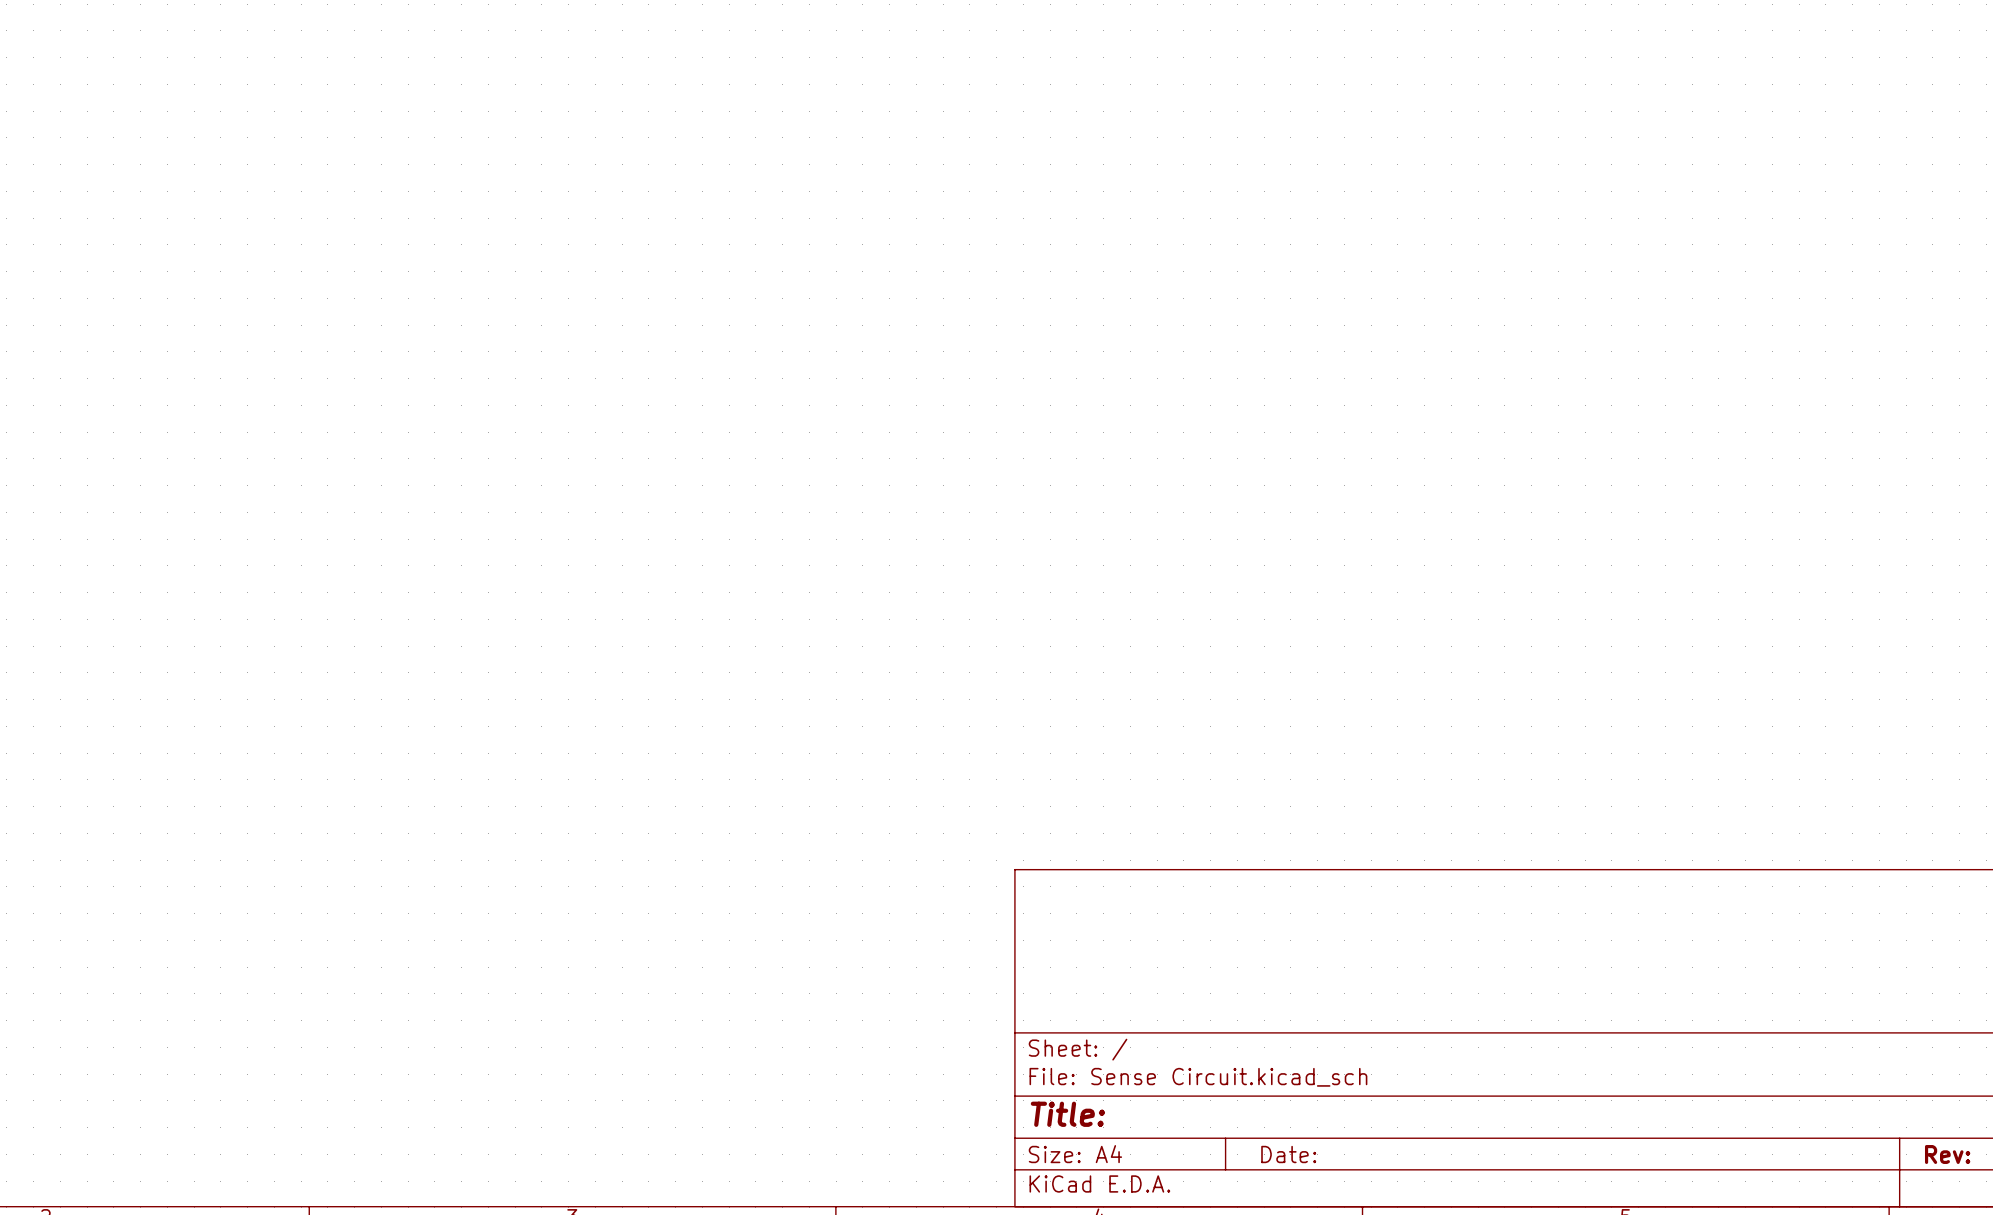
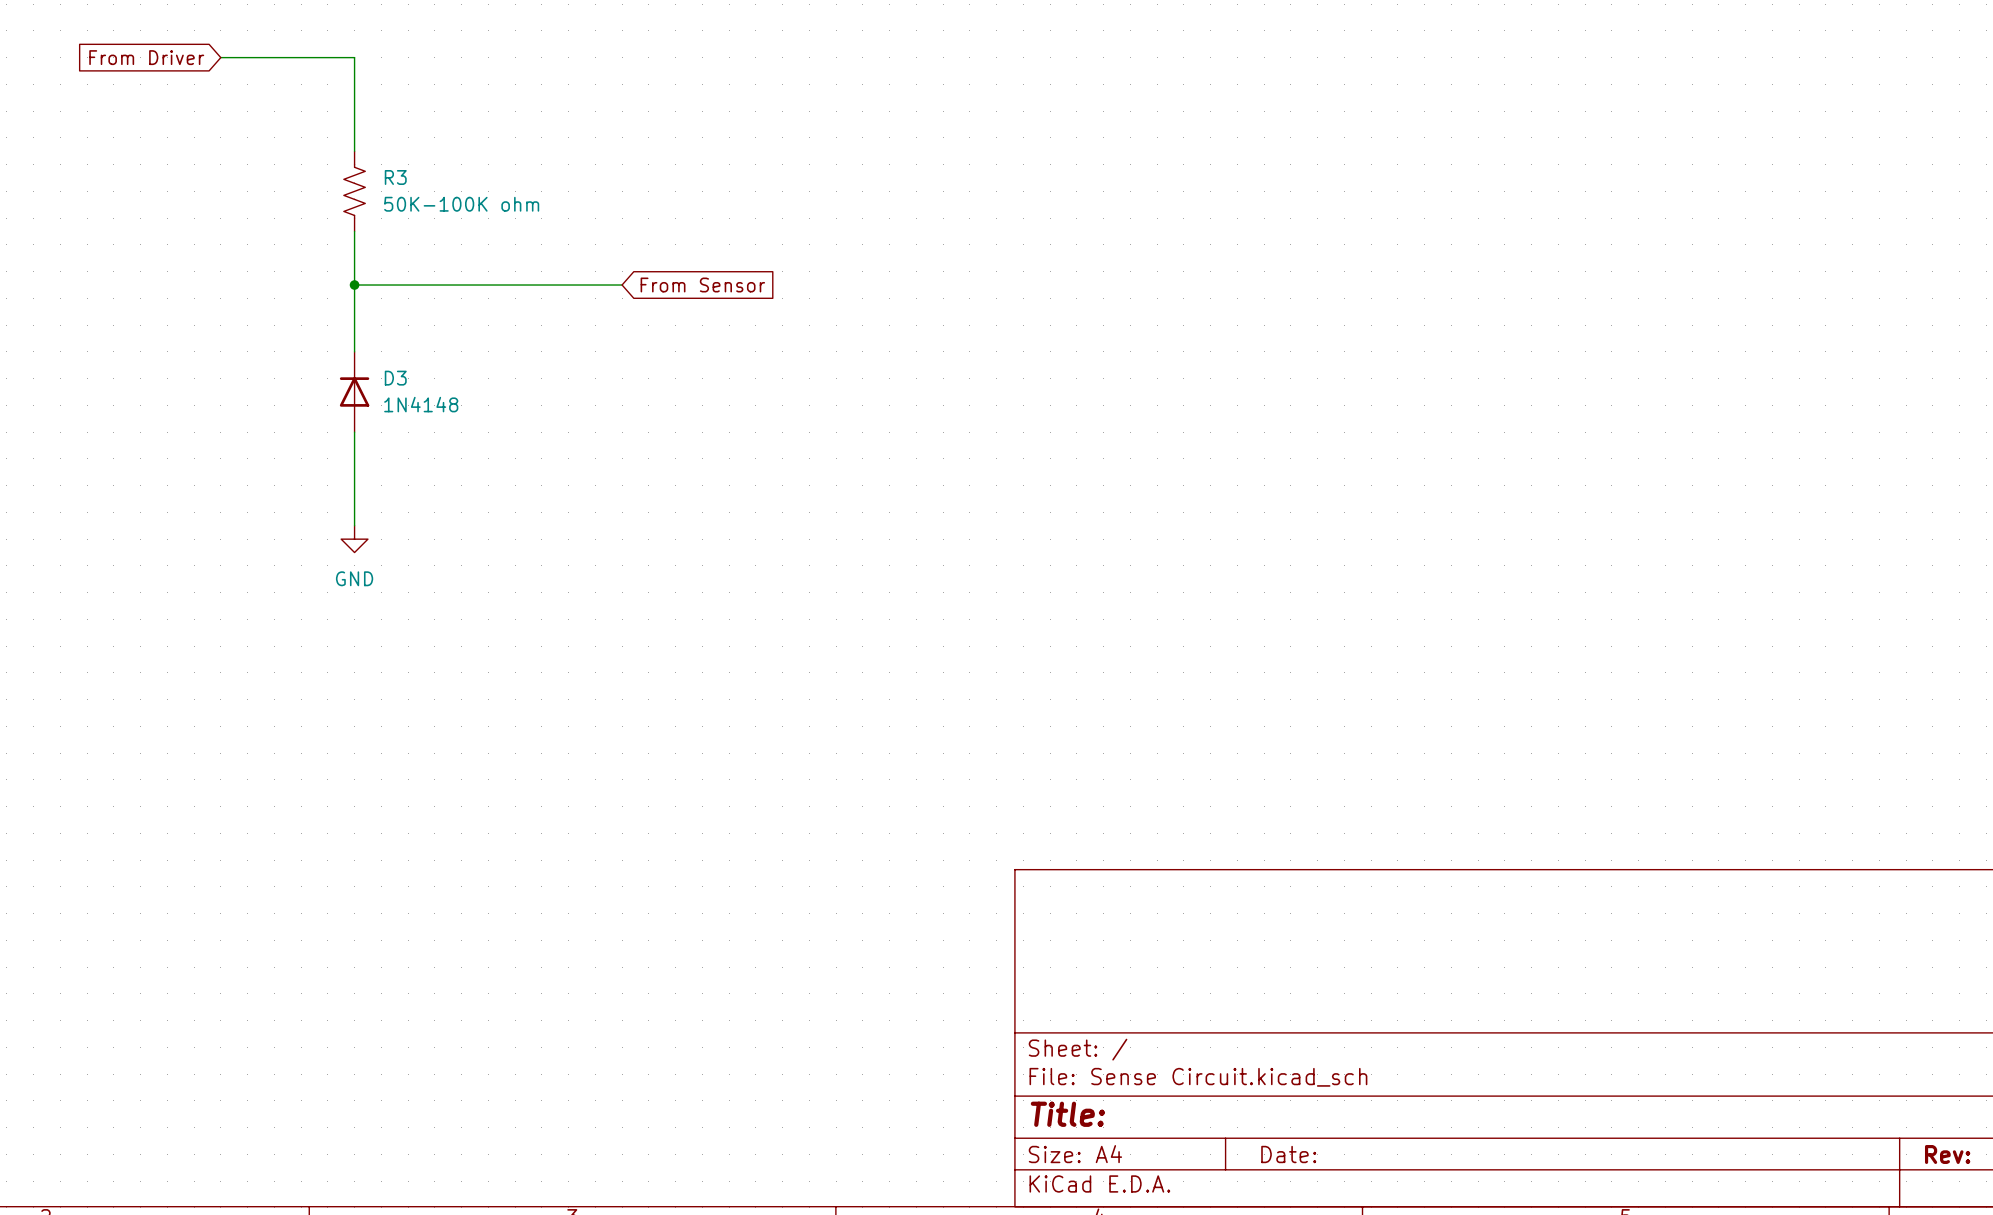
global label: none -> From Driver (146, 57)
wire: none -> (220, 57) (354, 57) (354, 151)
R3: none -> 50K-100K ohm (354, 191)
wire: none -> (354, 231) (354, 351)
wire: none -> (354, 285) (622, 285)
junction: none -> (354, 285)
global label: none -> From Sensor (702, 285)
D3: none -> 1N4148 (354, 392)
wire: none -> (354, 432) (354, 525)
power symbol: none -> GND (354, 539)

